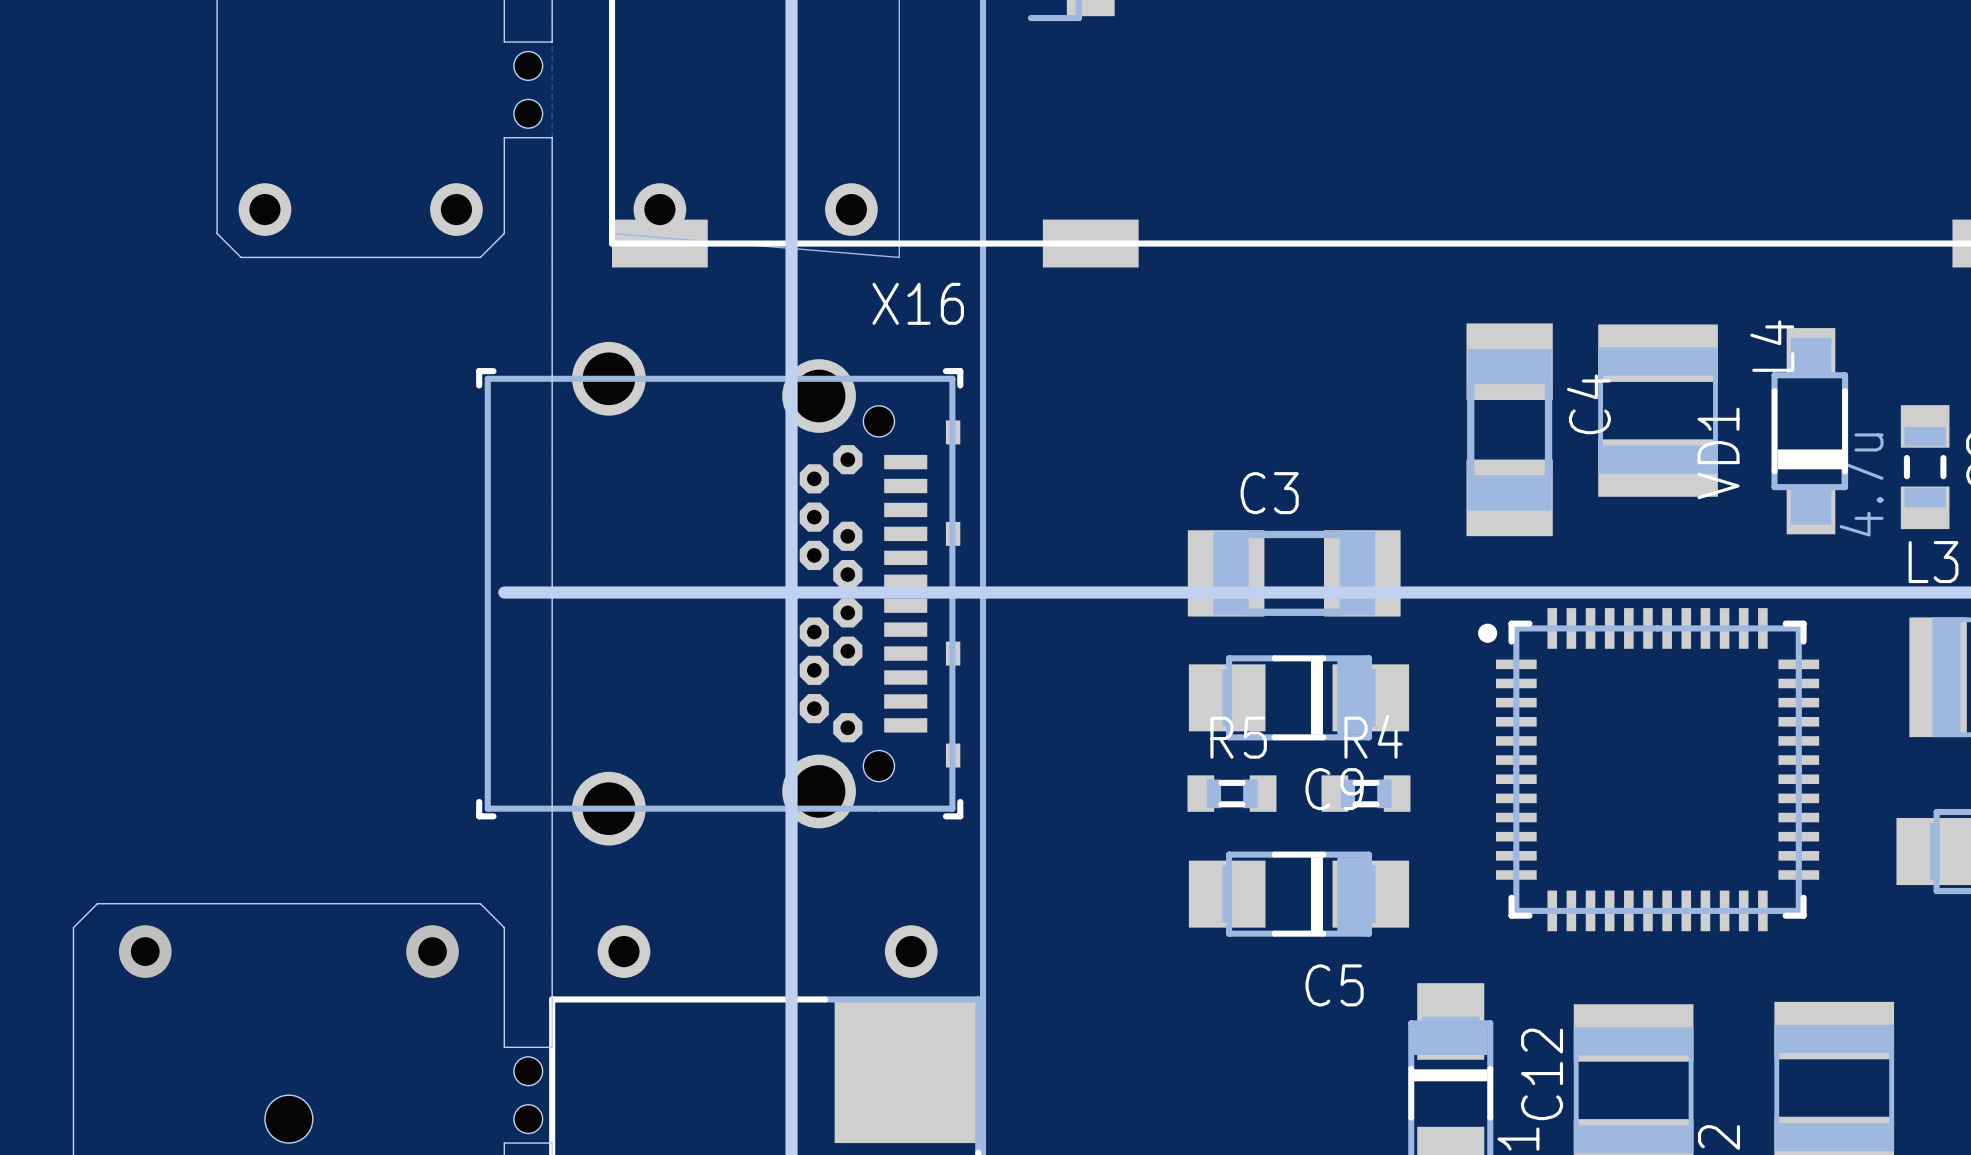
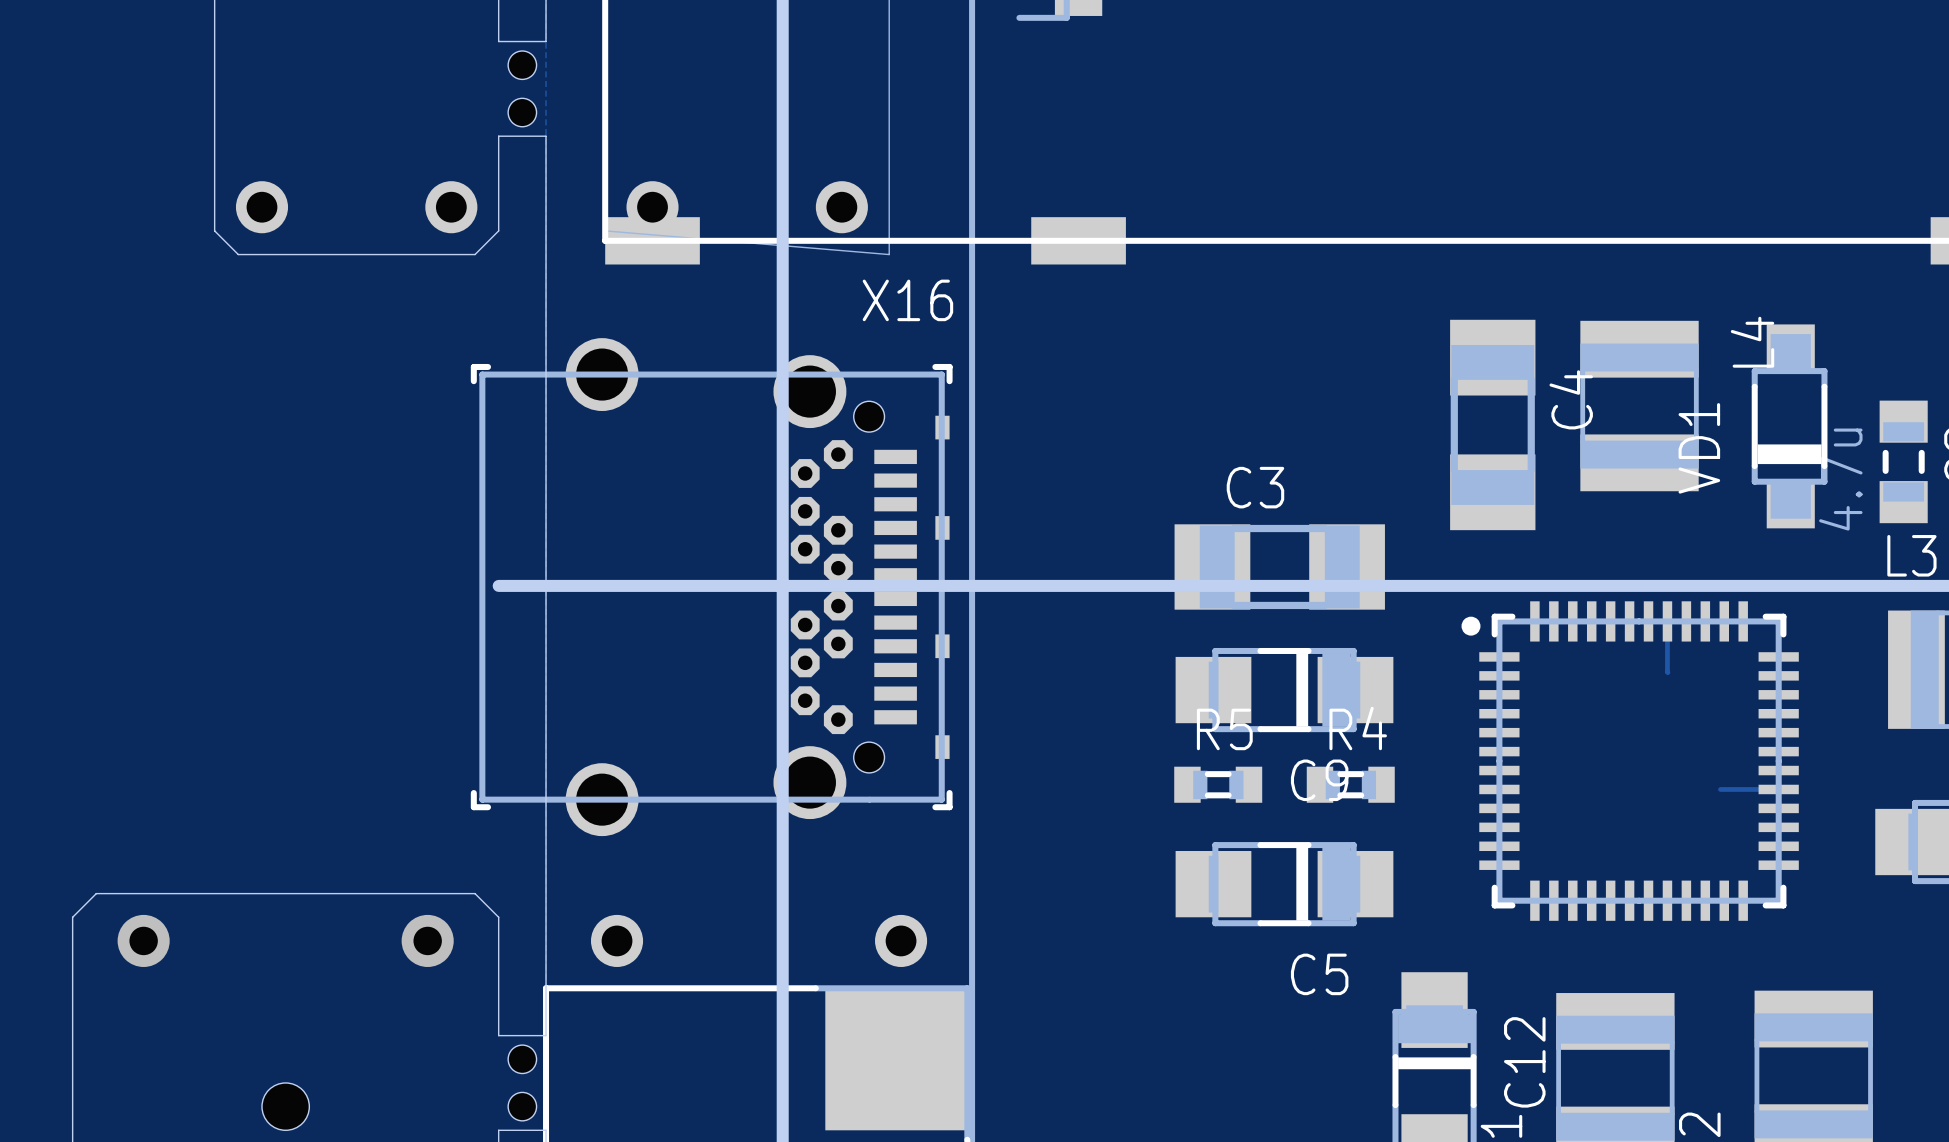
track: none -> (1667, 621) (1667, 672)
track: none -> (1720, 789) (1778, 789)

